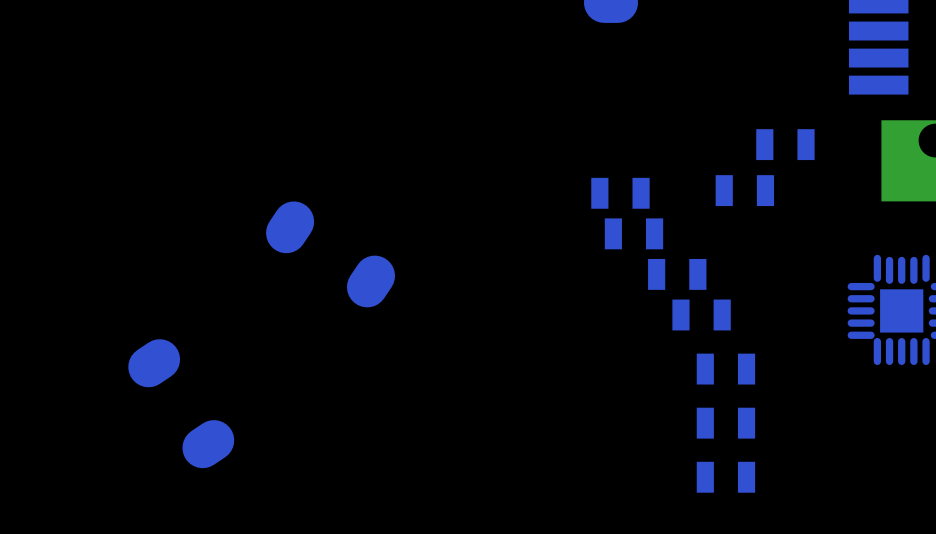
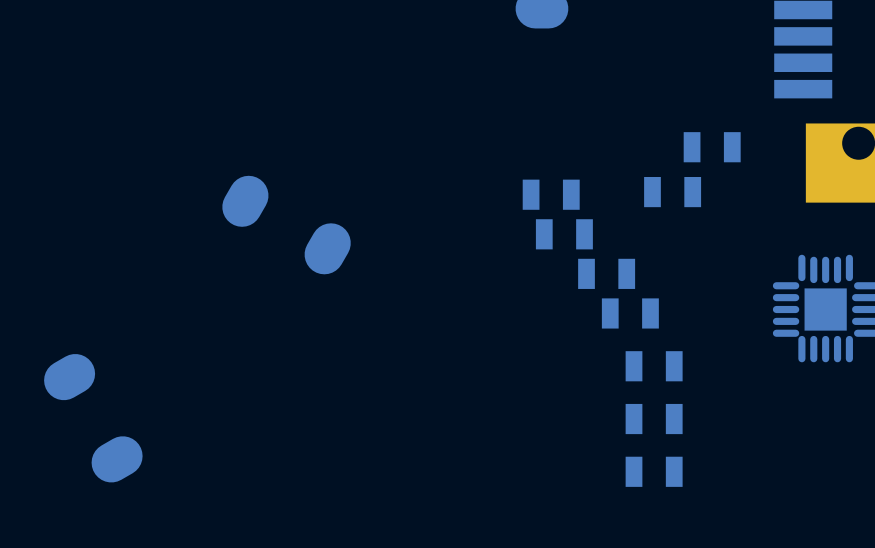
part: none -> (286, 225)
part: (330, 254) -> none
part: (181, 403) -> none
part: none -> (93, 418)

